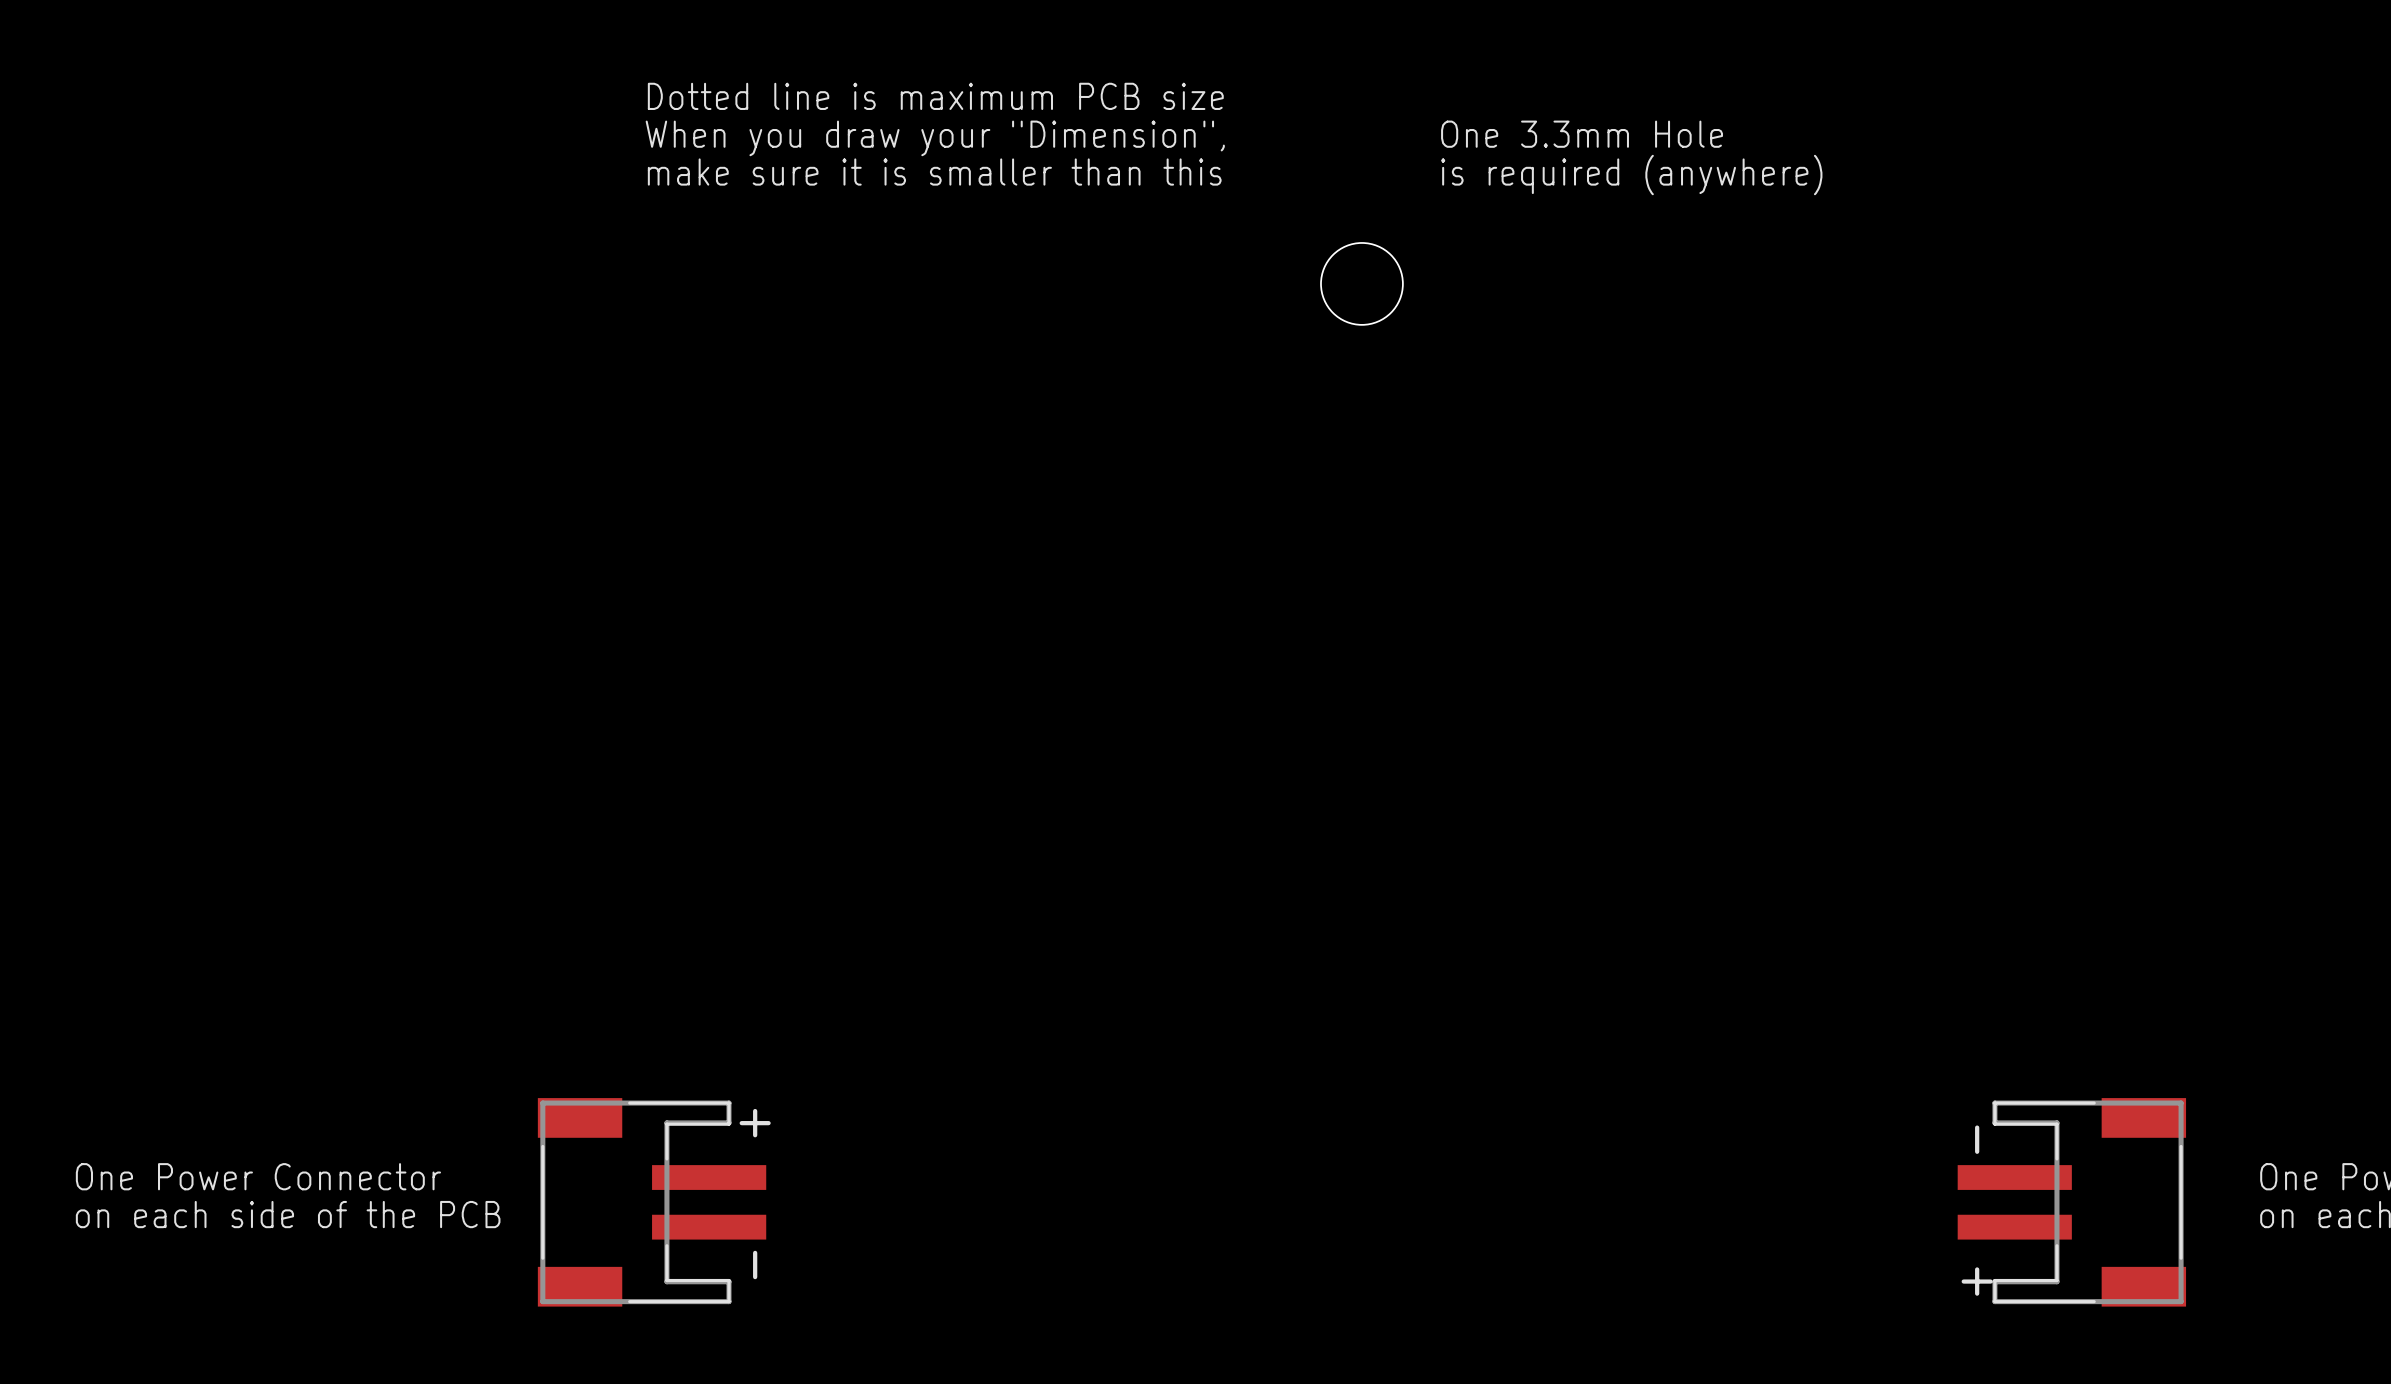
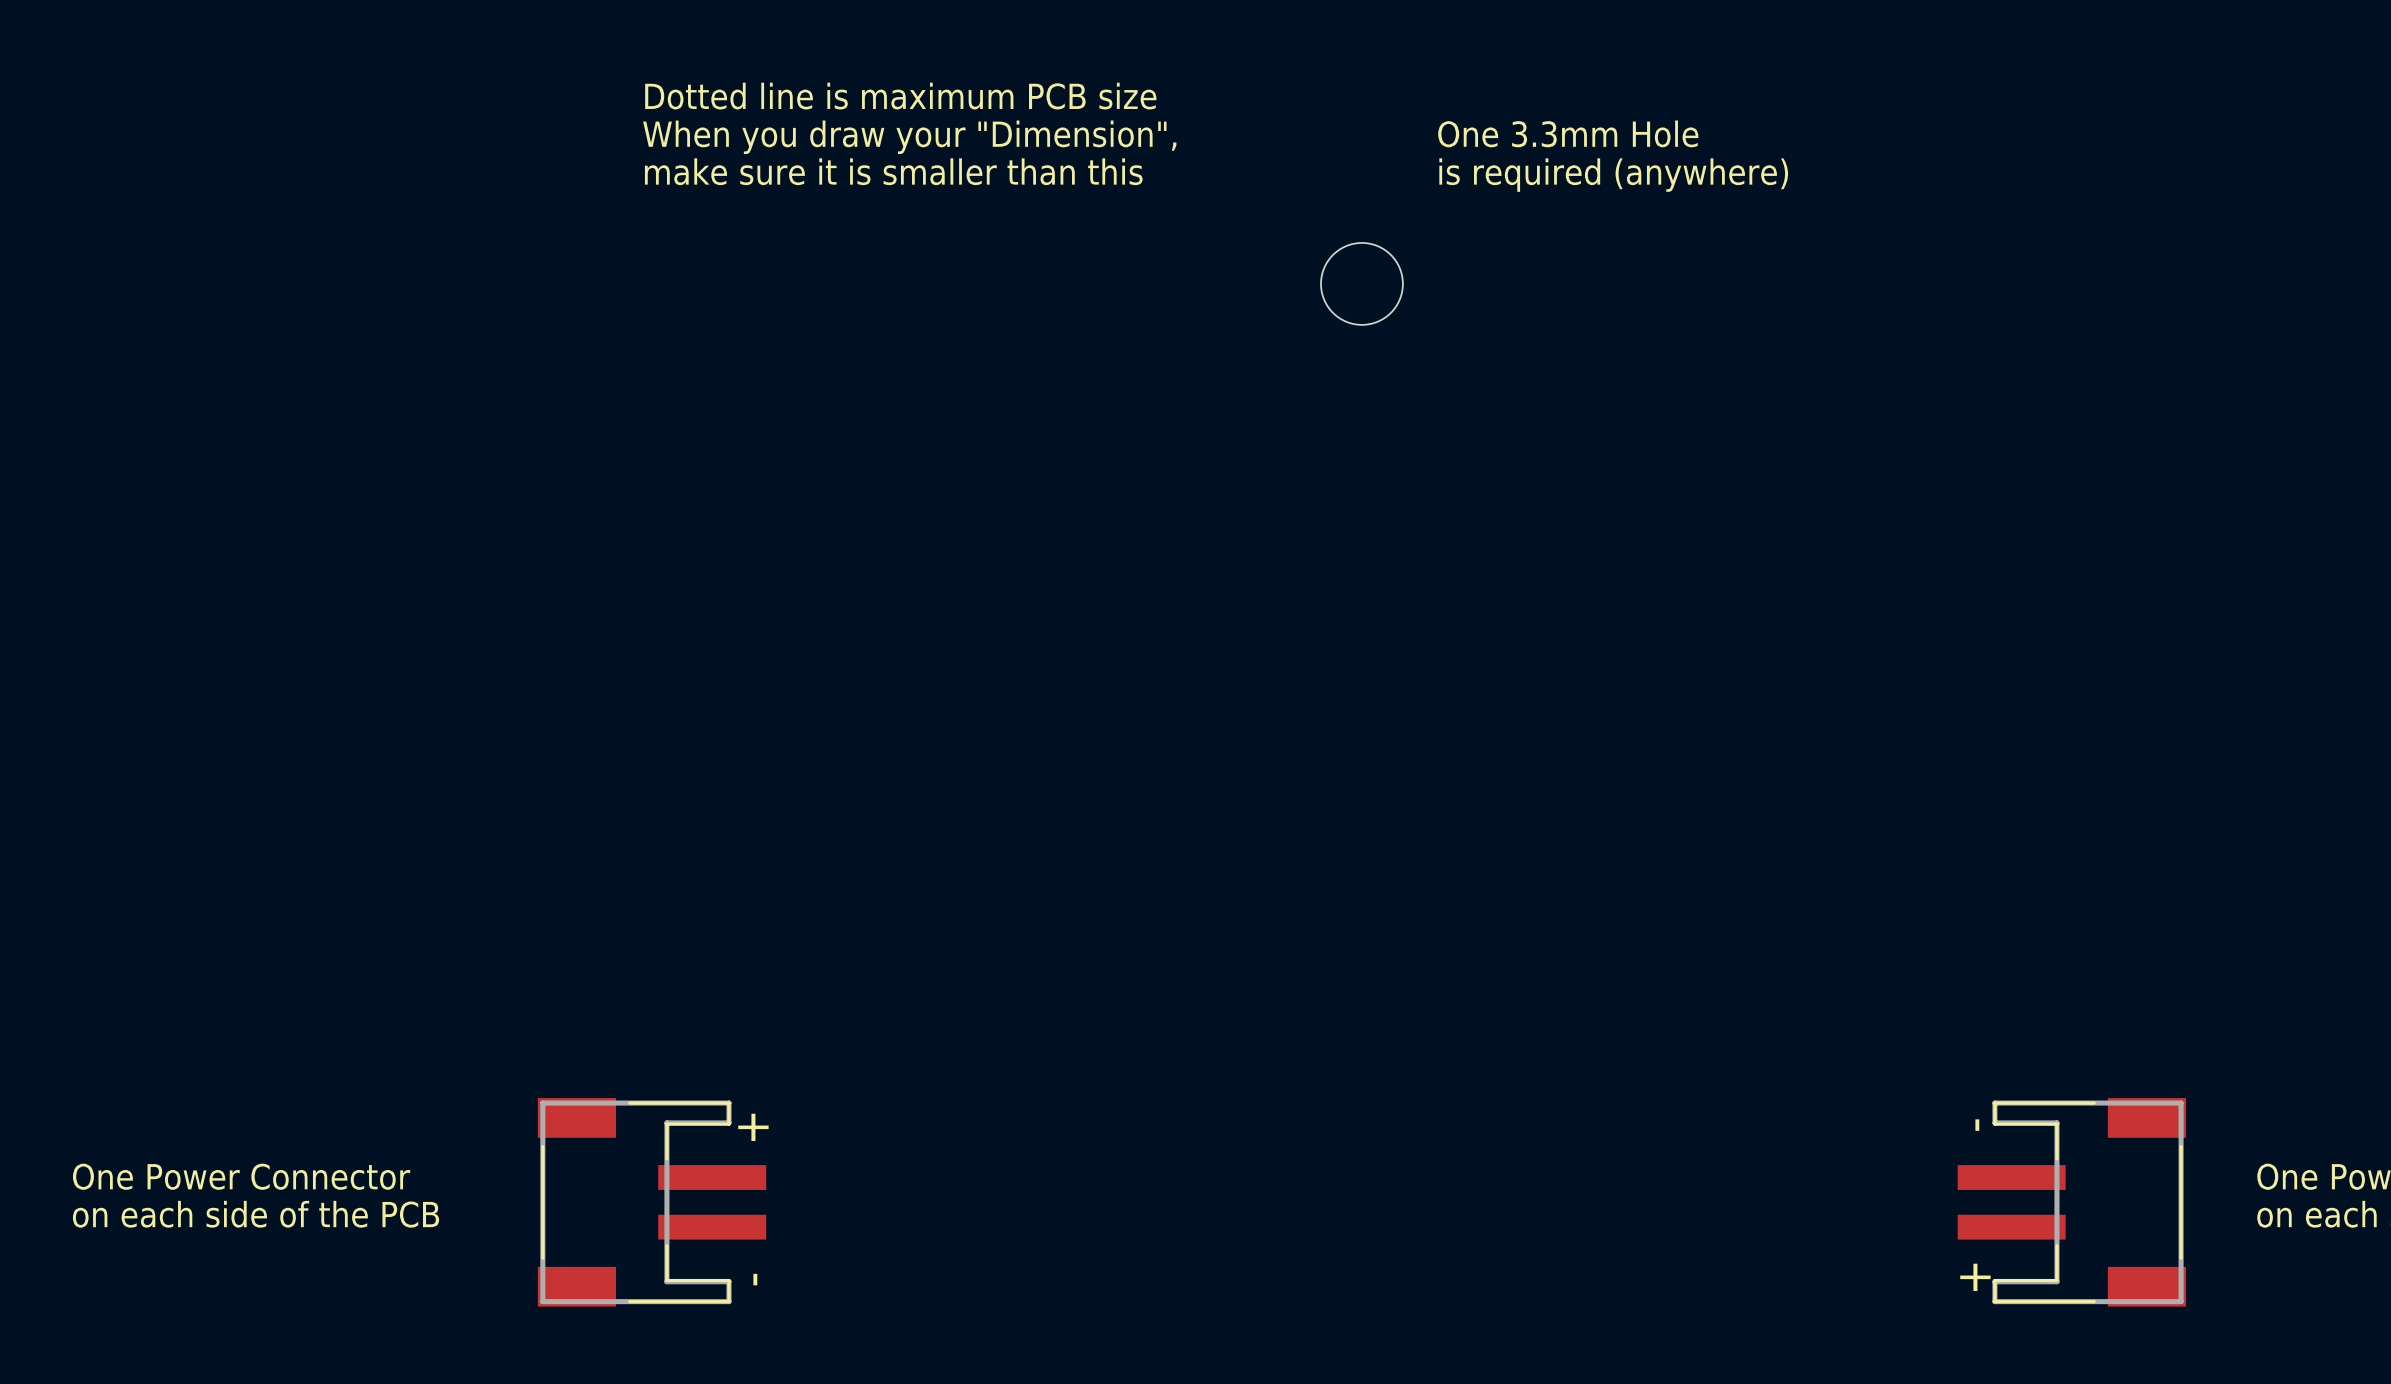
part footprint: [537, 1098, 767, 1307] -> [537, 1098, 767, 1307]
part footprint: [1957, 1098, 2187, 1307] -> [1957, 1098, 2187, 1307]

